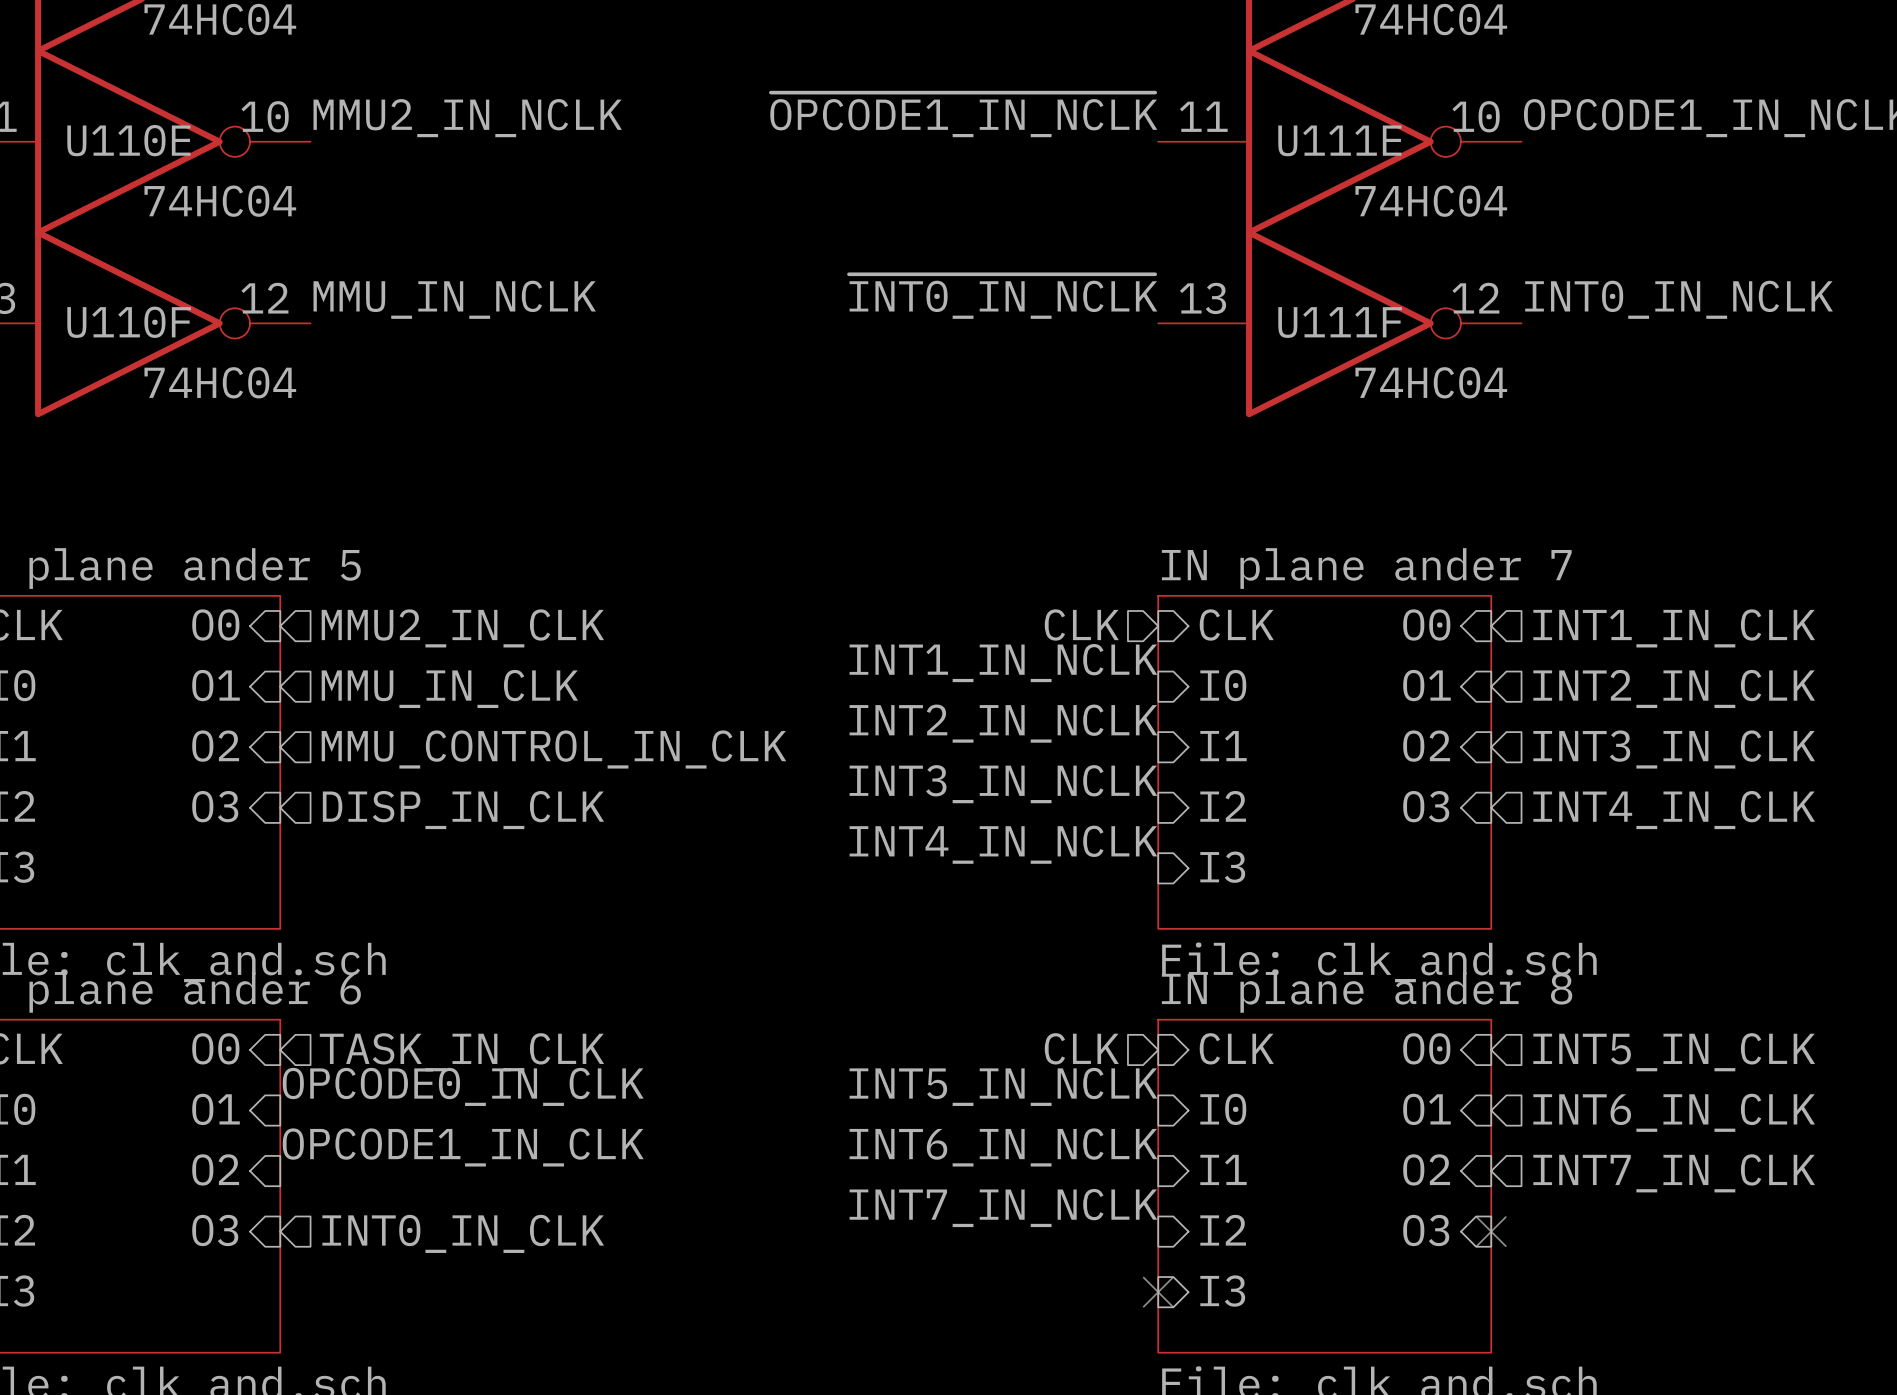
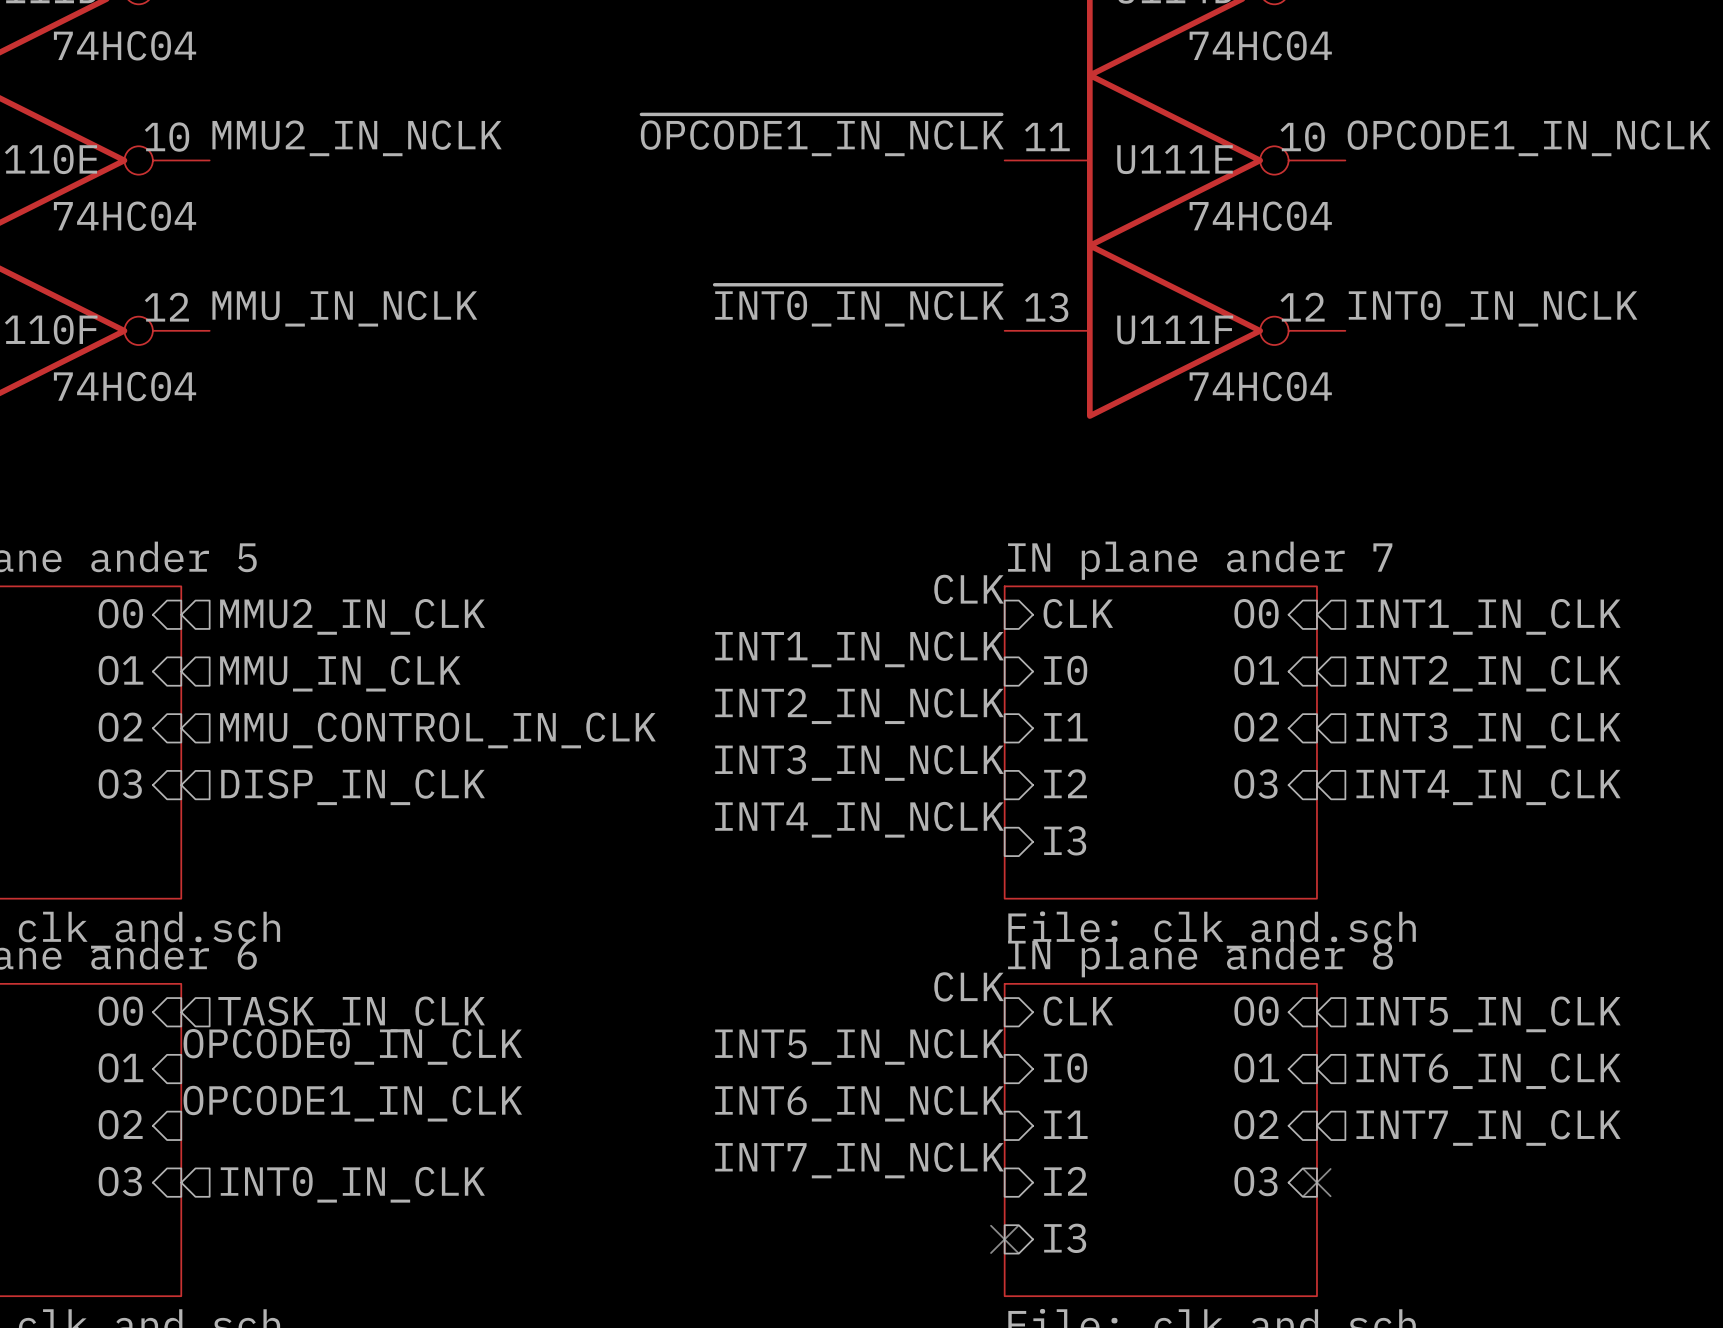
label: none -> CLK (969, 589)
hierarchical label: CLK (1081, 625) -> none
label: none -> CLK (969, 986)
hierarchical label: CLK (1081, 1048) -> none

